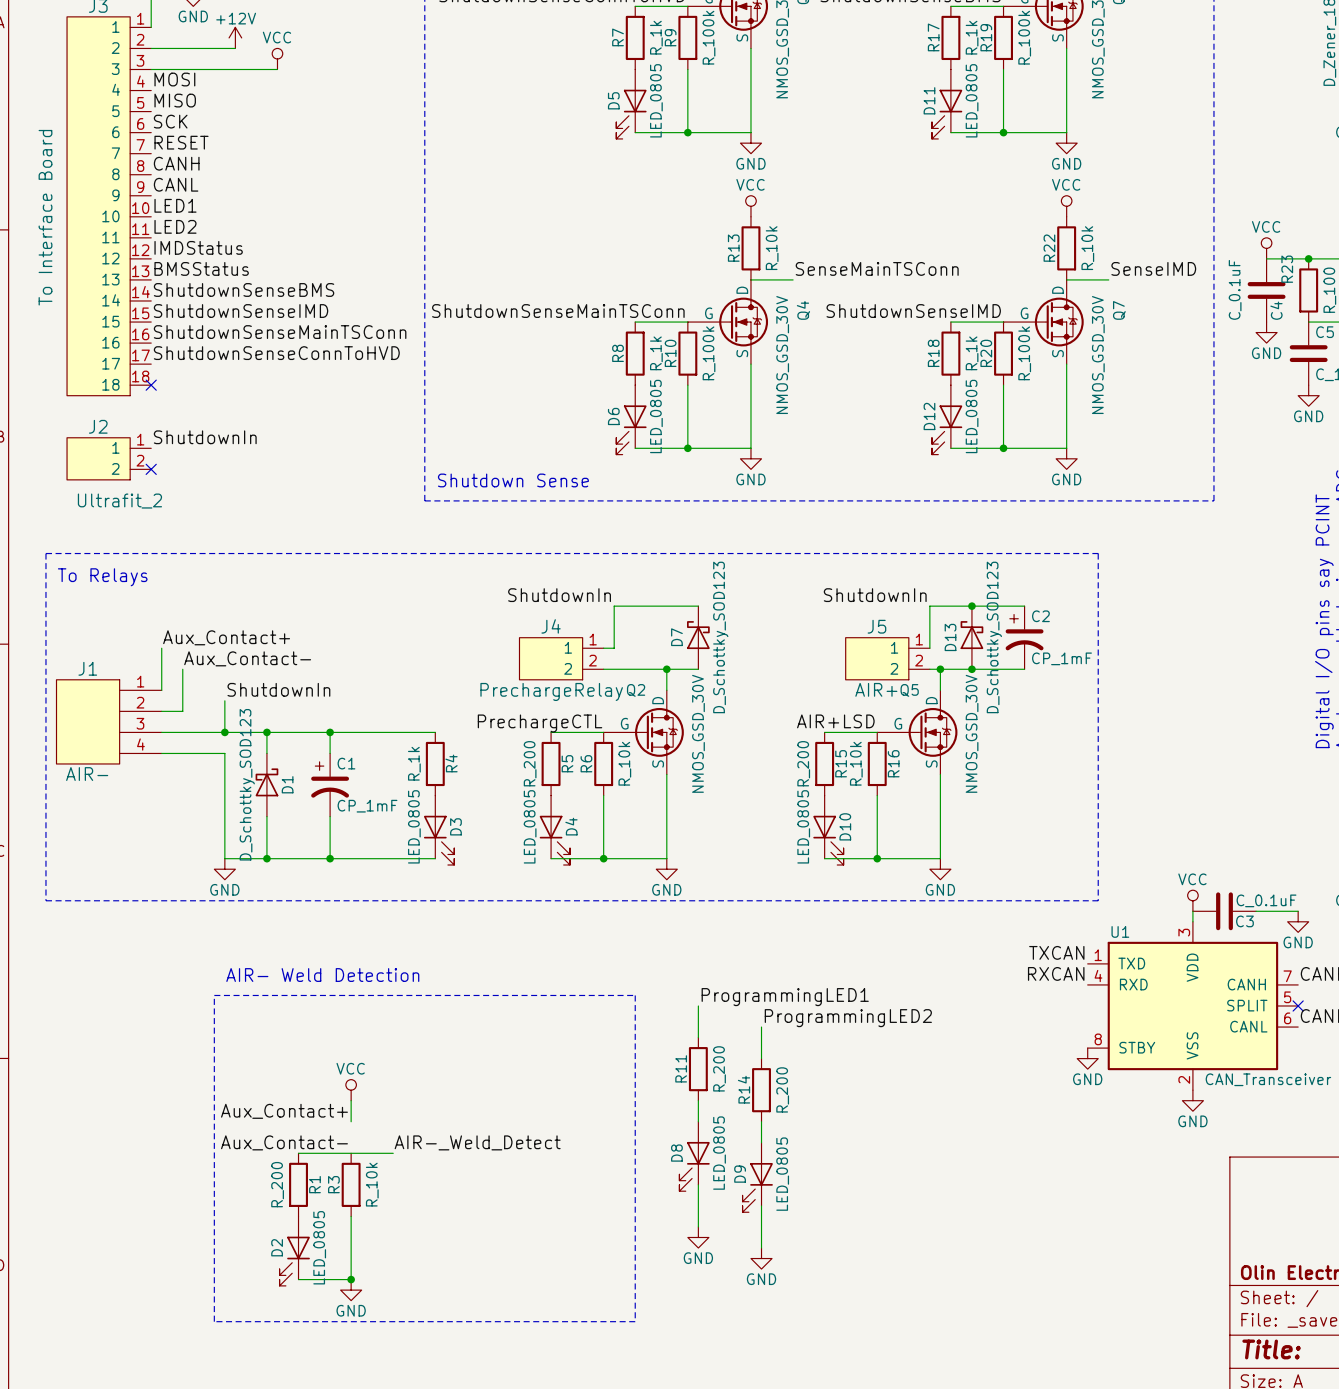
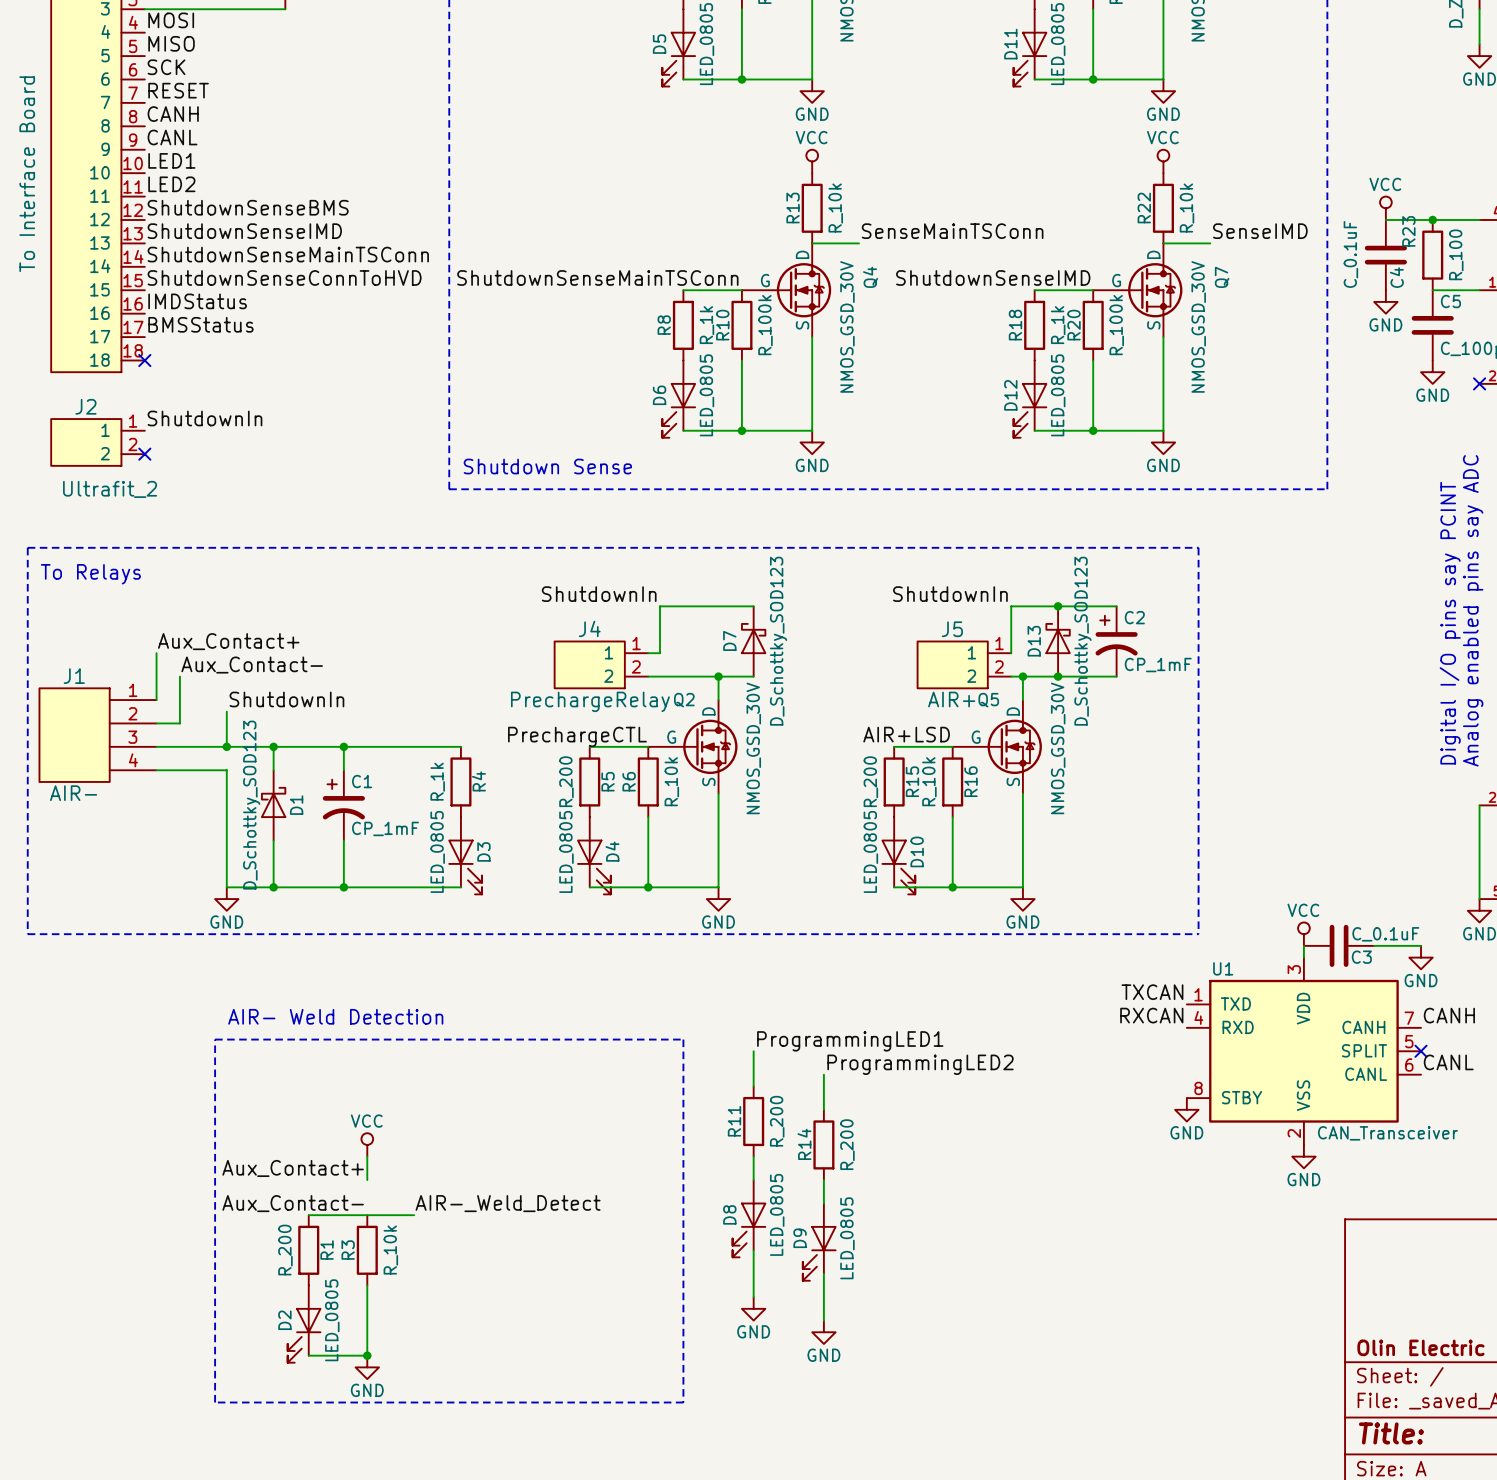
label: IMDStatus (198, 247) -> ShutdownSenseBMS (248, 207)
label: BMSStatus (201, 268) -> ShutdownSenseIMD (244, 231)
label: ShutdownSenseBMS (244, 289) -> ShutdownSenseMainTSConn (288, 254)
label: ShutdownSenseIMD (241, 311) -> ShutdownSenseConnToHVD (284, 277)
label: ShutdownSenseMainTSConn (280, 332) -> IMDStatus (197, 301)
label: ShutdownSenseConnToHVD (276, 353) -> BMSStatus (200, 324)

